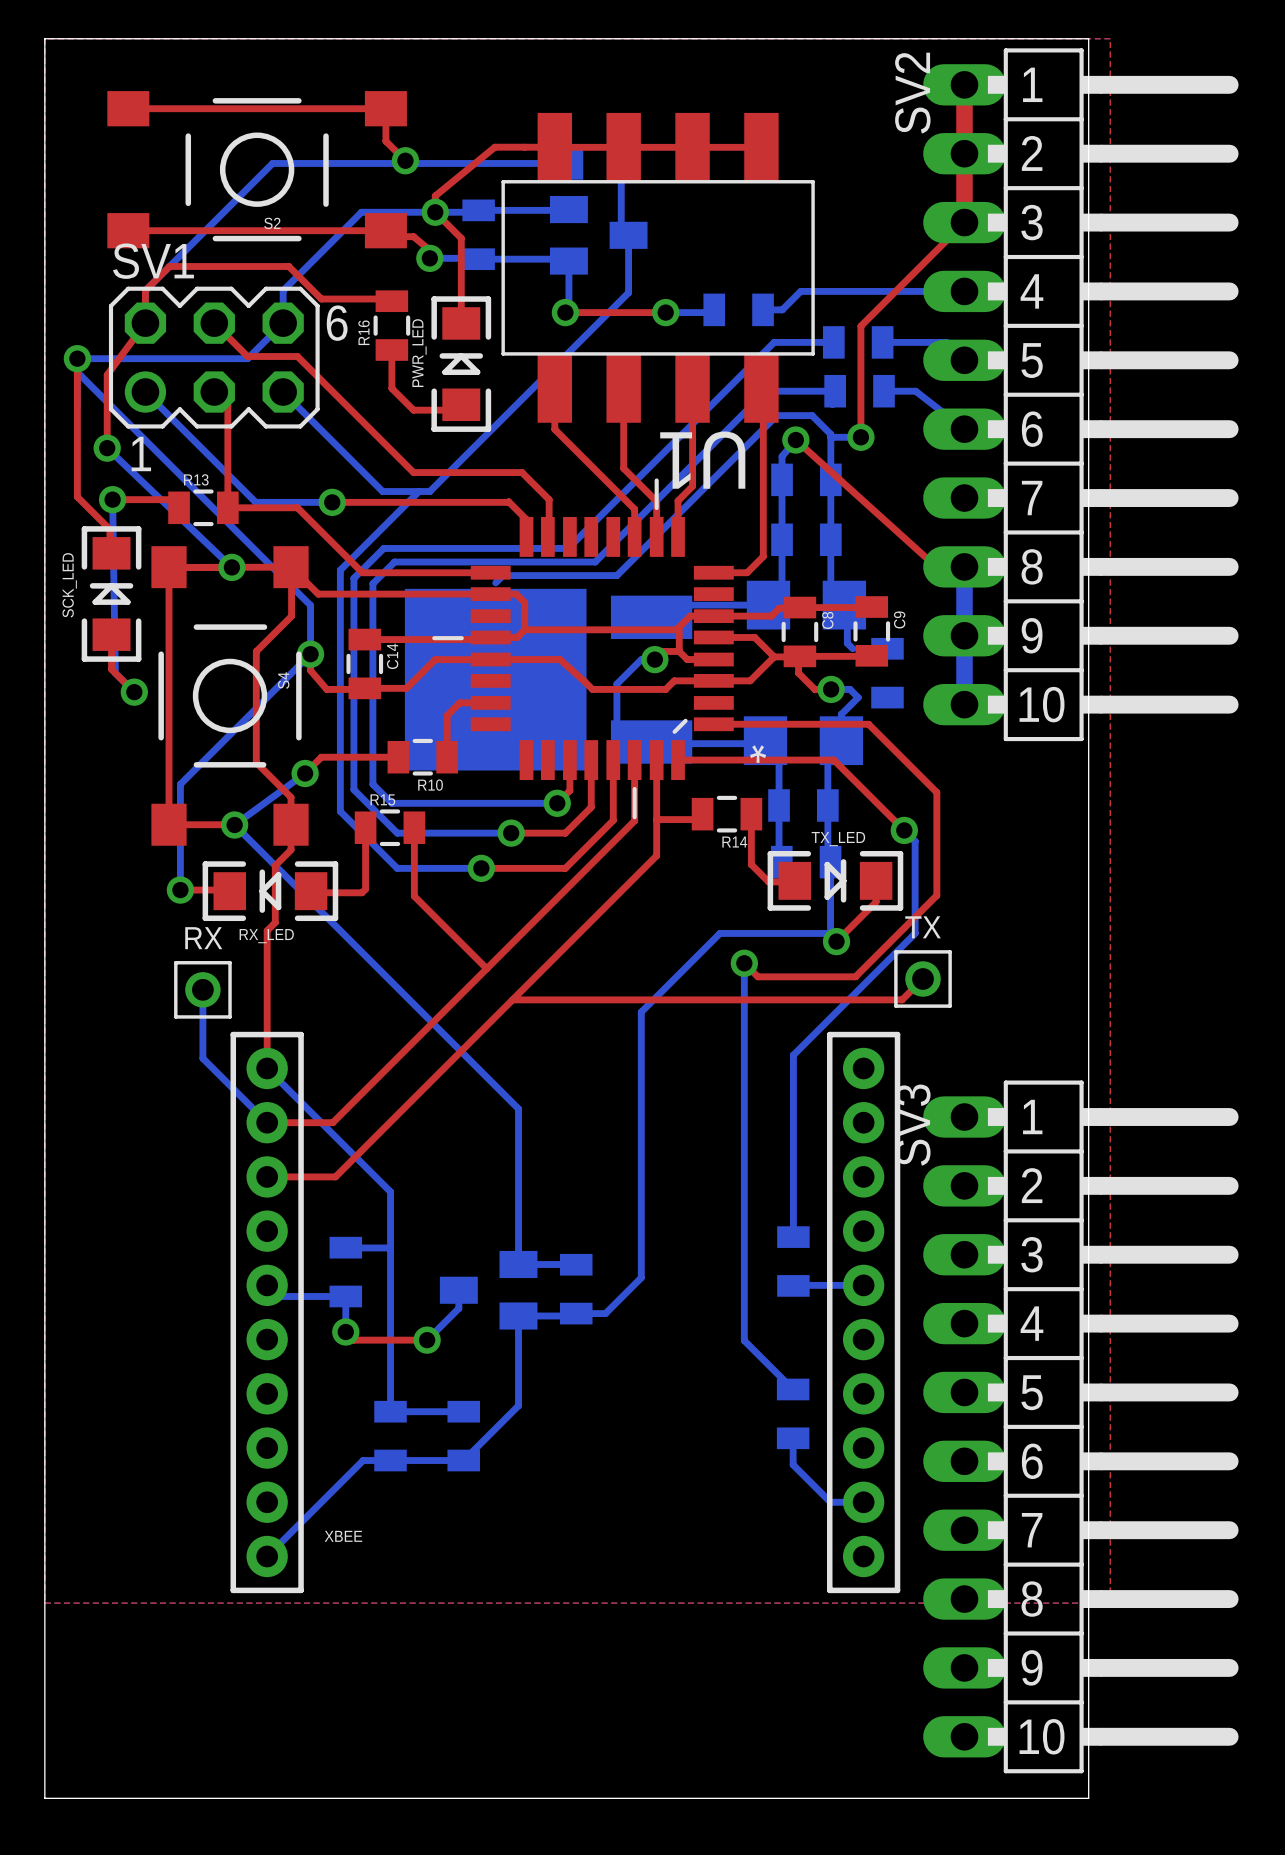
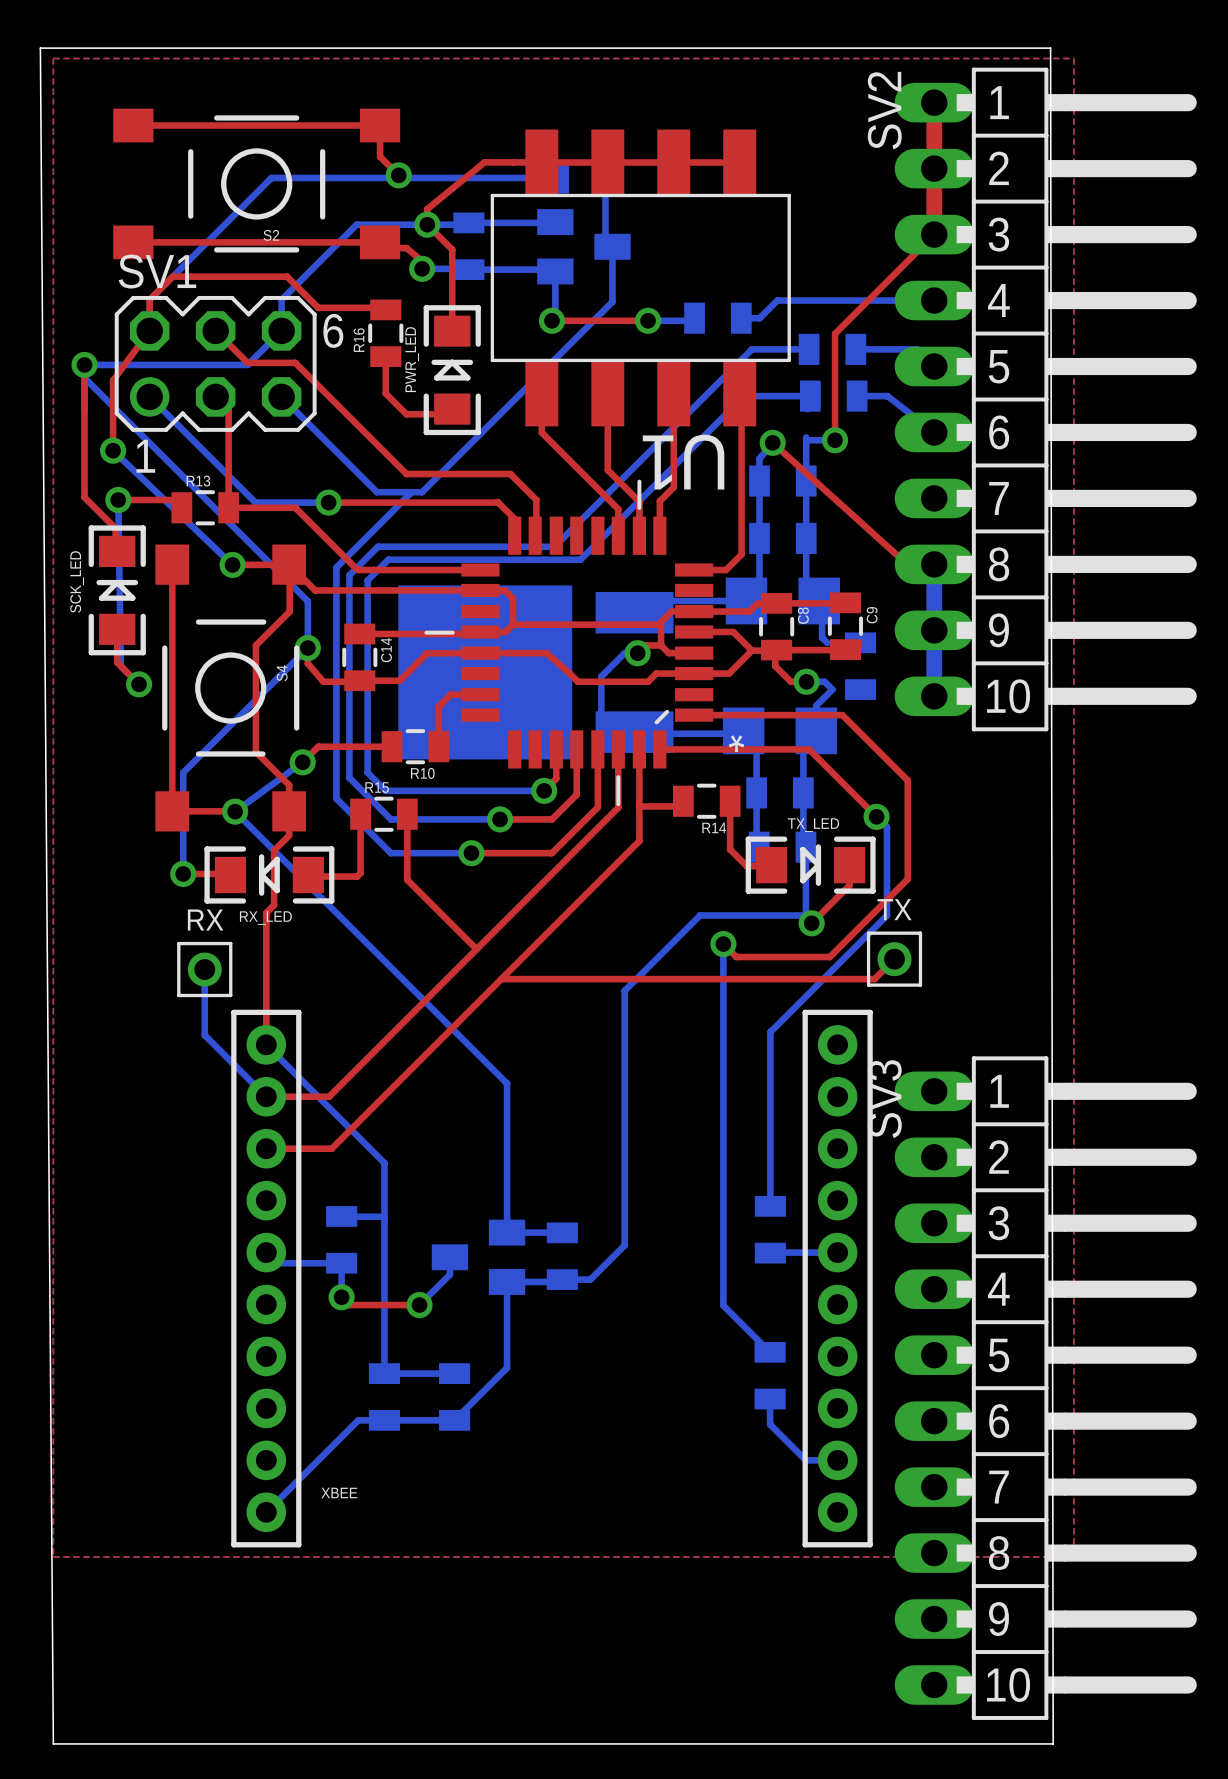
bottom track: (830, 434) (812, 415) (776, 415) (616, 575) (503, 575) (495, 582) -> none
top track: (291, 567) (182, 567) (231, 567) -> (289, 564) (232, 564)
board edge: (44, 1798) (44, 38) (1088, 38) (1088, 1798) -> (53, 1743) (40, 48) (1050, 48) (1053, 1743)

